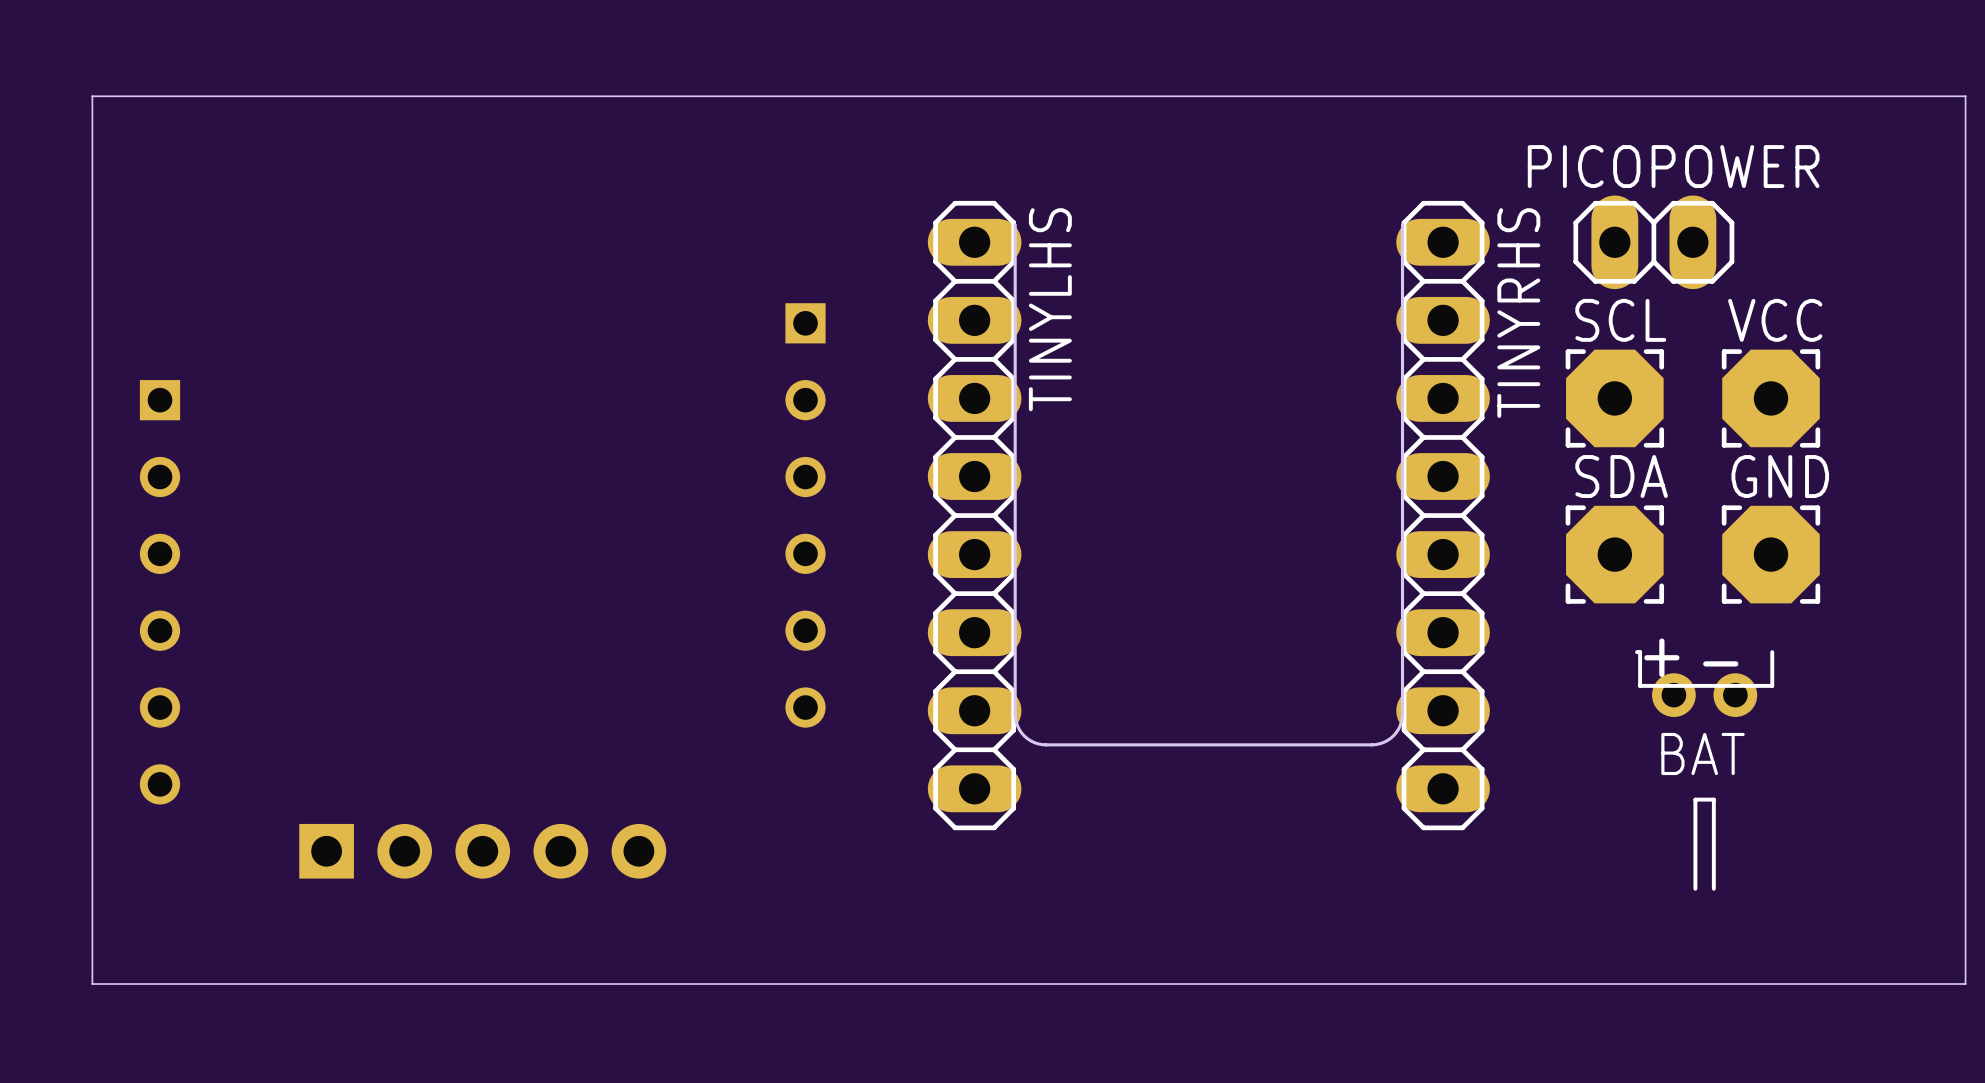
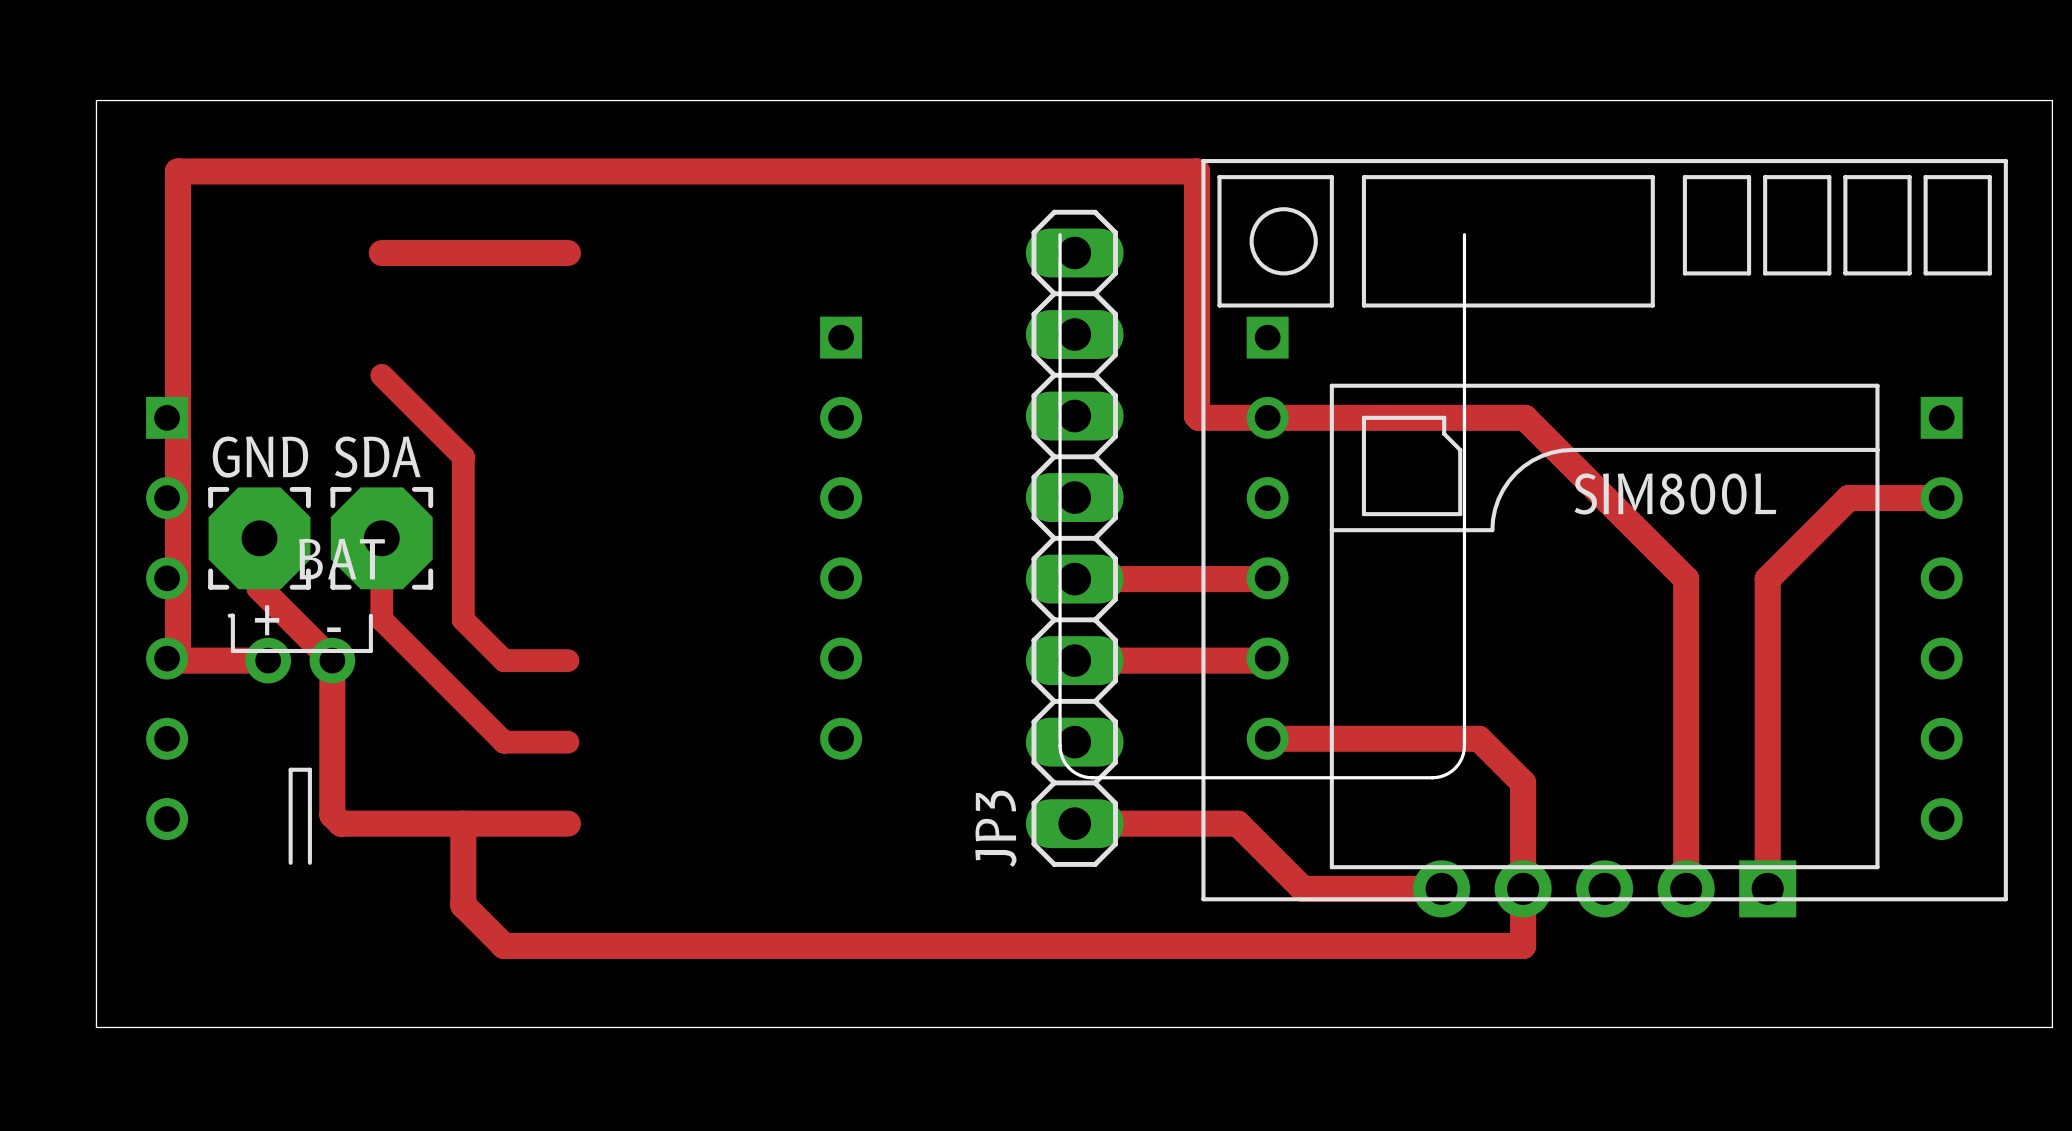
track: none -> (381, 252) (567, 252)
PICOPOWER: (1653, 242) -> none
track: none -> (381, 375) (463, 456) (463, 619) (504, 660) (567, 660)
SCL: (1614, 398) -> none
VCC: (1770, 398) -> none
track: none -> (1941, 498) (1848, 498) (1767, 579) (1767, 888)
part: none -> (1604, 530)
track: none -> (259, 538) (259, 587) (332, 660) (332, 815) (341, 823) (567, 823)
GND: none -> (259, 538)
track: none -> (381, 538) (381, 619) (504, 742) (567, 742)
SDA: none -> (381, 538)
TINYLHS: (974, 515) -> none
JP3: none -> (1074, 538)
TINYRHS: (1443, 515) -> none
track: none -> (1267, 578) (1092, 579)
SDA: (1614, 554) -> none
GND: (1770, 554) -> none
track: none -> (1267, 658) (1265, 660) (1092, 660)
track: none -> (268, 660) (177, 660) (177, 171) (1197, 171) (1197, 416) (1198, 417) (1524, 417) (1686, 579) (1686, 888)
BAT: none -> (300, 739)
track: none -> (1267, 738) (1479, 738) (1523, 782) (1523, 945) (504, 945) (463, 905) (463, 823)
BAT: (1704, 770) -> none
track: none -> (1092, 823) (1237, 823) (1303, 888) (1441, 888)
part: (482, 851) -> none
part: none -> (1604, 888)

